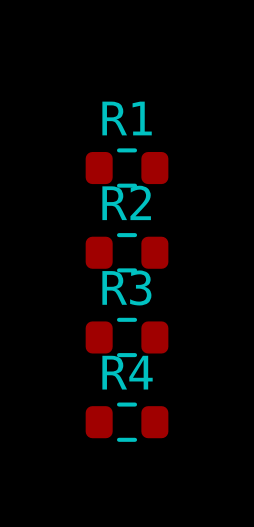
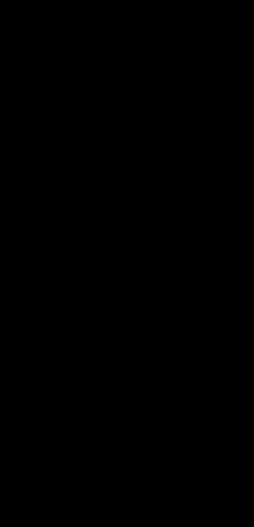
R1: (127, 168) -> none
R2: (127, 252) -> none
R3: (127, 337) -> none
R4: (127, 422) -> none

